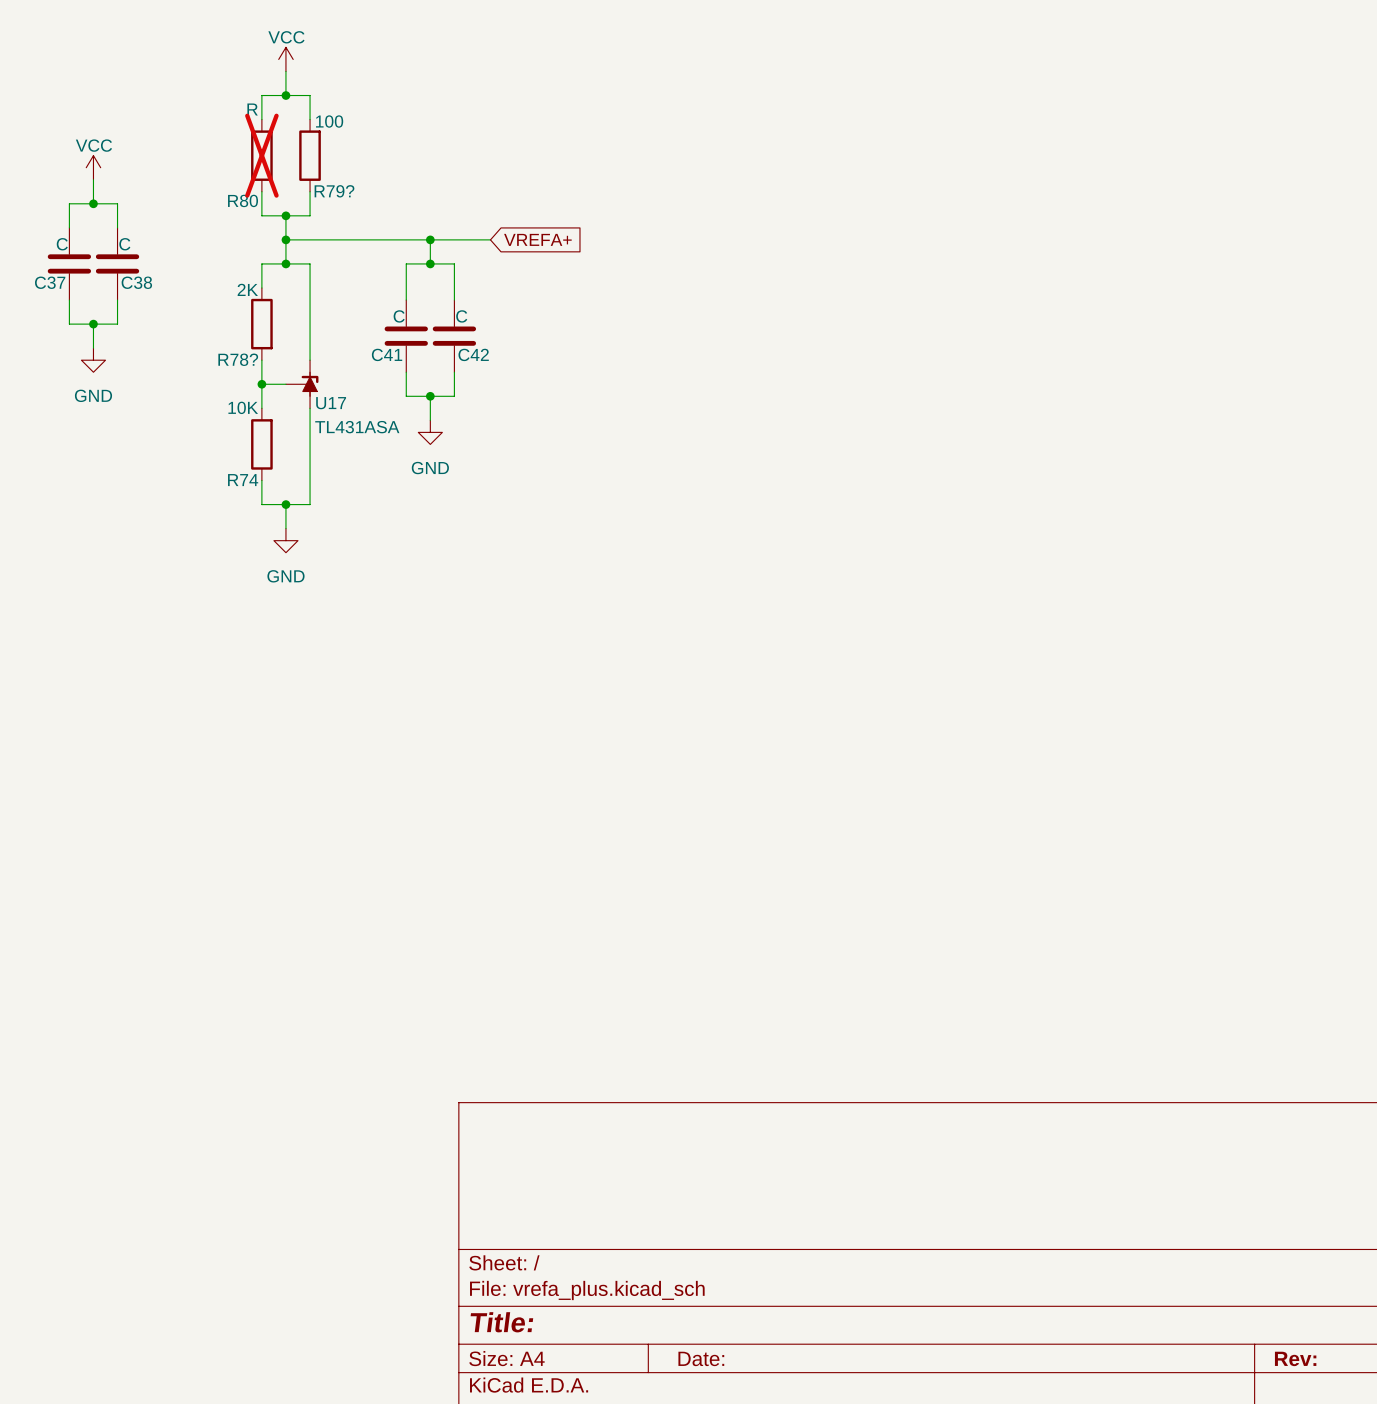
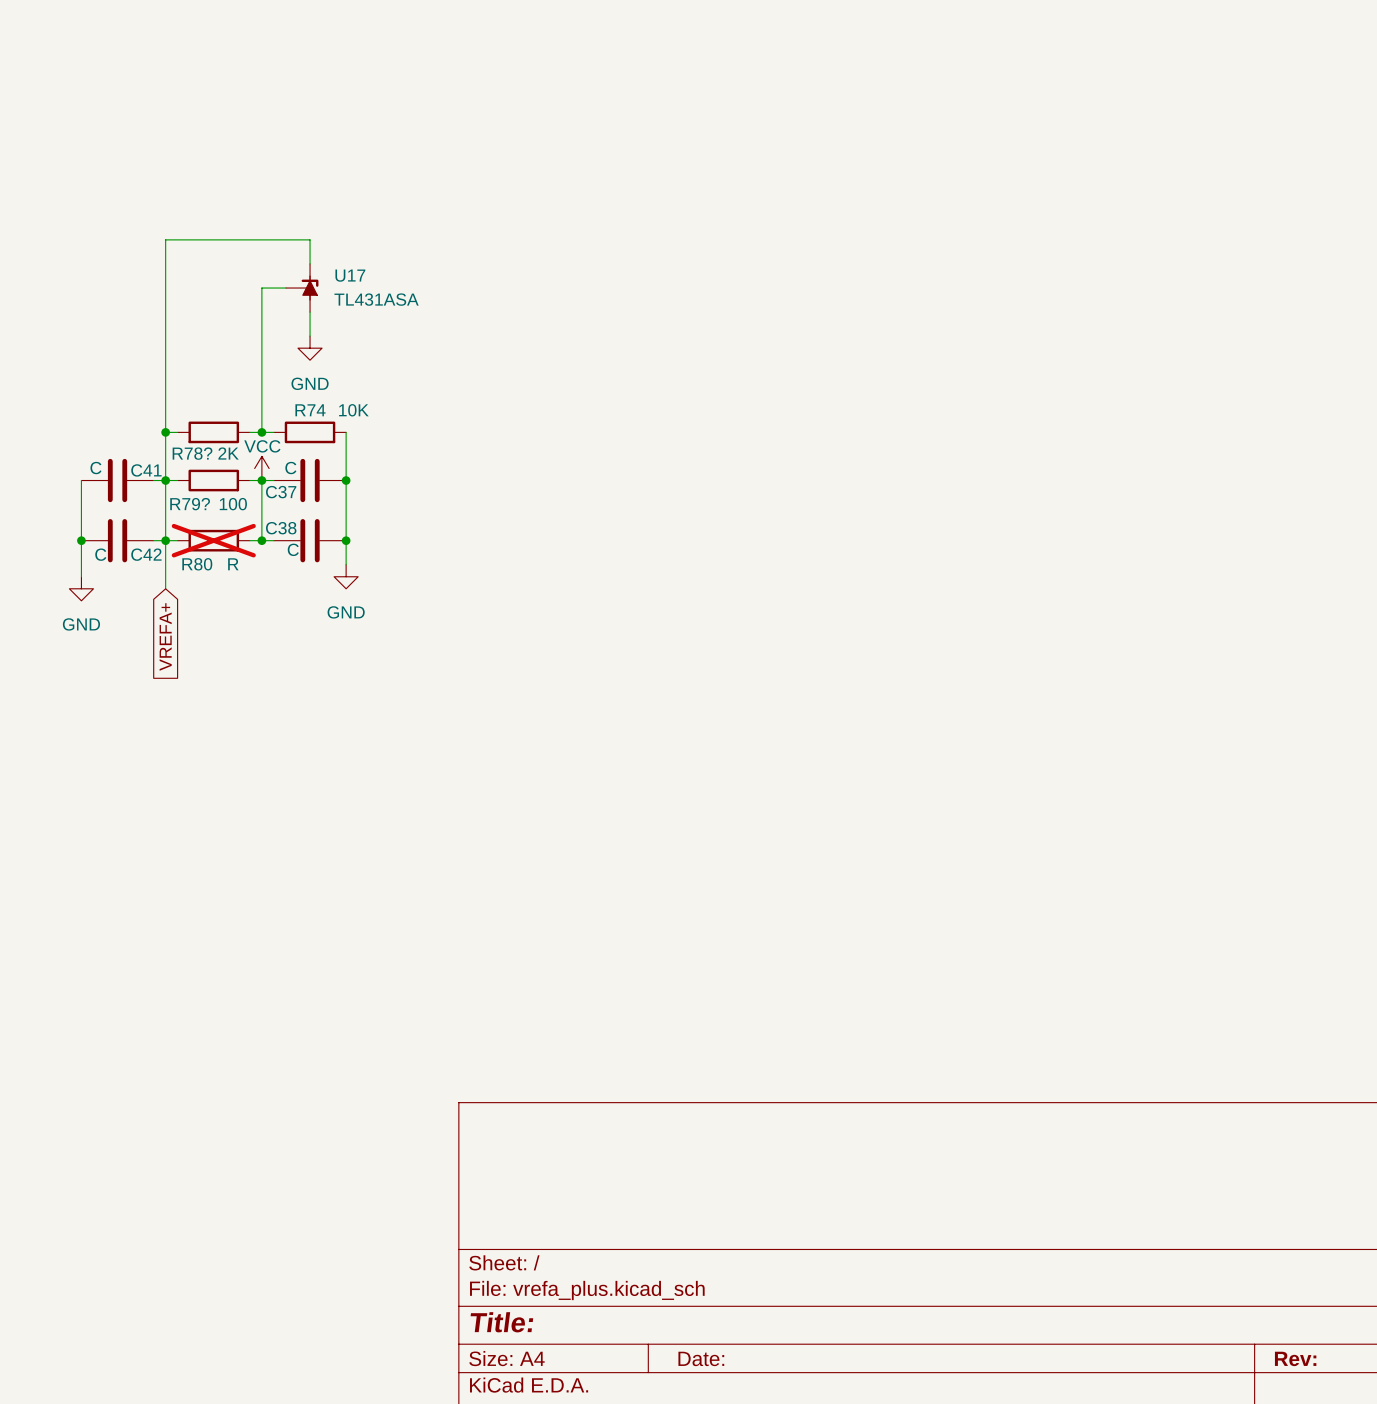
power symbol: VCC (285, 59) -> none
wire: (285, 71) (285, 95) -> none
junction: (285, 95) -> none
R80 value position: R (252, 109) -> R (233, 564)
wire: (261, 119) (261, 95) (310, 95) (310, 119) -> none
R80 rotation: 0° (261, 155) -> 90° clockwise (213, 540)
R80 position: (261, 155) -> (213, 540)
R79? rotation: 0° (310, 155) -> 90° clockwise (213, 480)
R79? position: (310, 155) -> (213, 480)
power symbol: VCC (93, 167) -> none
wire: (93, 179) (93, 203) -> none
wire: (261, 191) (261, 215) (310, 215) (310, 191) -> none
R80 name position: R80 (243, 200) -> R80 (197, 564)
junction: (93, 203) -> none
wire: (285, 215) (285, 263) -> none
junction: (285, 215) -> none
wire: (69, 227) (69, 203) (117, 203) (117, 227) -> none
wire: none -> (285, 239) (165, 239) (165, 588)
junction: (285, 239) -> none
wire: (310, 239) (490, 239) -> (310, 239) (310, 263)
wire: (430, 239) (430, 263) -> none
junction: (430, 239) -> none
global label: VREFA+ (537, 239) -> none
C38 value position: C (124, 244) -> C (293, 549)
C37 rotation: 0° (69, 263) -> 90° clockwise (310, 480)
C37 position: (69, 263) -> (310, 480)
C38 rotation: 0° (117, 263) -> 90° clockwise (310, 540)
C38 position: (117, 263) -> (310, 540)
junction: (285, 263) -> none
junction: (430, 263) -> none
C38 name position: C38 (136, 282) -> C38 (281, 528)
wire: (261, 288) (261, 263) (310, 263) (310, 312) -> none
wire: none -> (285, 288) (261, 288) (261, 360)
R78? value position: 2K (247, 289) -> 2K (228, 453)
wire: (69, 300) (69, 324) (117, 324) (117, 300) -> none
wire: (406, 300) (406, 263) (454, 263) (454, 300) -> none
C42 value position: C (461, 316) -> C (100, 554)
wire: (93, 324) (93, 348) -> none
junction: (93, 324) -> none
R78? rotation: 0° (261, 324) -> 90° clockwise (213, 432)
R78? position: (261, 324) -> (213, 432)
C41 rotation: 0° (406, 336) -> 90° clockwise (117, 480)
C41 position: (406, 336) -> (117, 480)
C42 rotation: 0° (454, 336) -> 90° clockwise (117, 540)
C42 position: (454, 336) -> (117, 540)
power symbol: none -> GND (310, 348)
C41 name position: C41 (387, 354) -> C41 (146, 470)
power symbol: GND (93, 360) -> none
wire: (406, 372) (406, 396) (454, 396) (454, 372) -> none
wire: (261, 384) (285, 384) -> (249, 432) (273, 432)
junction: (261, 384) -> none
U17 position: (302, 384) -> (302, 288)
wire: (430, 396) (430, 420) -> none
junction: (430, 396) -> none
U17 name position: U17 (331, 403) -> U17 (350, 275)
wire: (310, 408) (310, 504) (261, 504) -> (261, 540) (261, 504)
U17 value position: TL431ASA (357, 427) -> TL431ASA (376, 299)
wire: none -> (165, 432) (177, 432)
junction: none -> (165, 432)
junction: none -> (261, 432)
wire: none -> (346, 432) (346, 564)
power symbol: GND (430, 432) -> none
R74 rotation: 0° (261, 444) -> 90° clockwise (310, 432)
R74 position: (261, 444) -> (310, 432)
power symbol: none -> VCC (261, 468)
wire: none -> (81, 480) (81, 576)
wire: none -> (153, 480) (177, 480)
junction: none -> (165, 480)
R74 name position: R74 (243, 480) -> R74 (310, 410)
wire: none -> (249, 480) (273, 480)
junction: none -> (261, 480)
junction: none -> (346, 480)
wire: (285, 504) (285, 528) -> none
junction: (285, 504) -> none
junction: none -> (81, 540)
wire: none -> (153, 540) (177, 540)
junction: none -> (165, 540)
wire: none -> (249, 540) (273, 540)
junction: none -> (261, 540)
power symbol position: GND (285, 540) -> GND (346, 576)
junction: none -> (346, 540)
power symbol: none -> GND (81, 588)
global label: none -> VREFA+ (165, 636)

